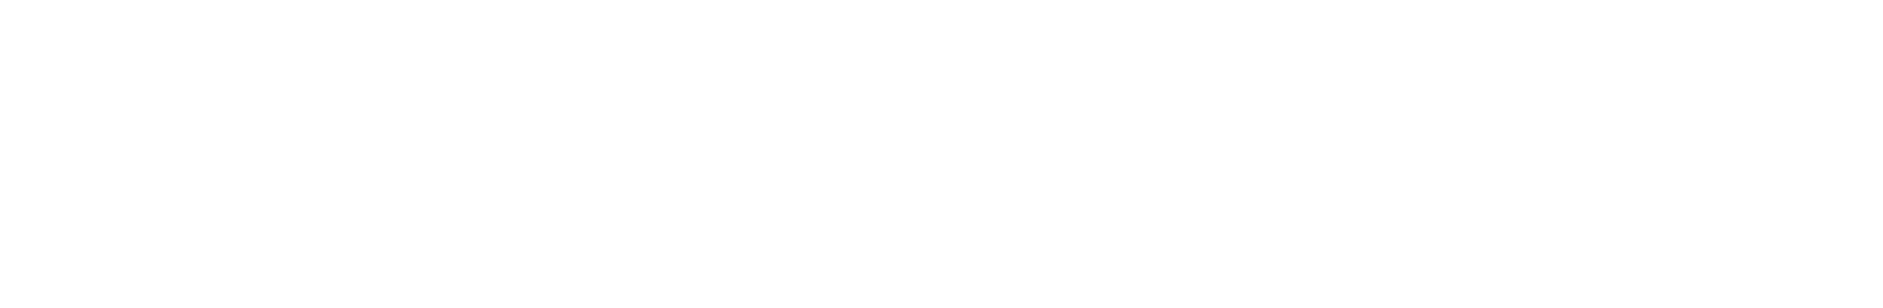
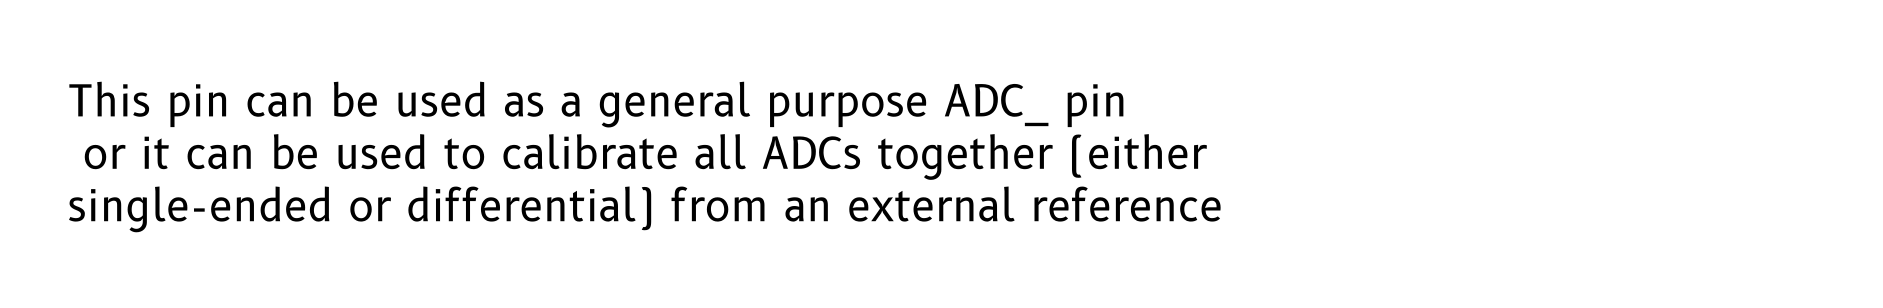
text: none -> This pin can be used as a general purpose ADC_ pin (596, 104)
text: none -> or it can be used to calibrate all ADCs together (either (645, 156)
text: none -> single-ended or differential) from an external reference (644, 209)

